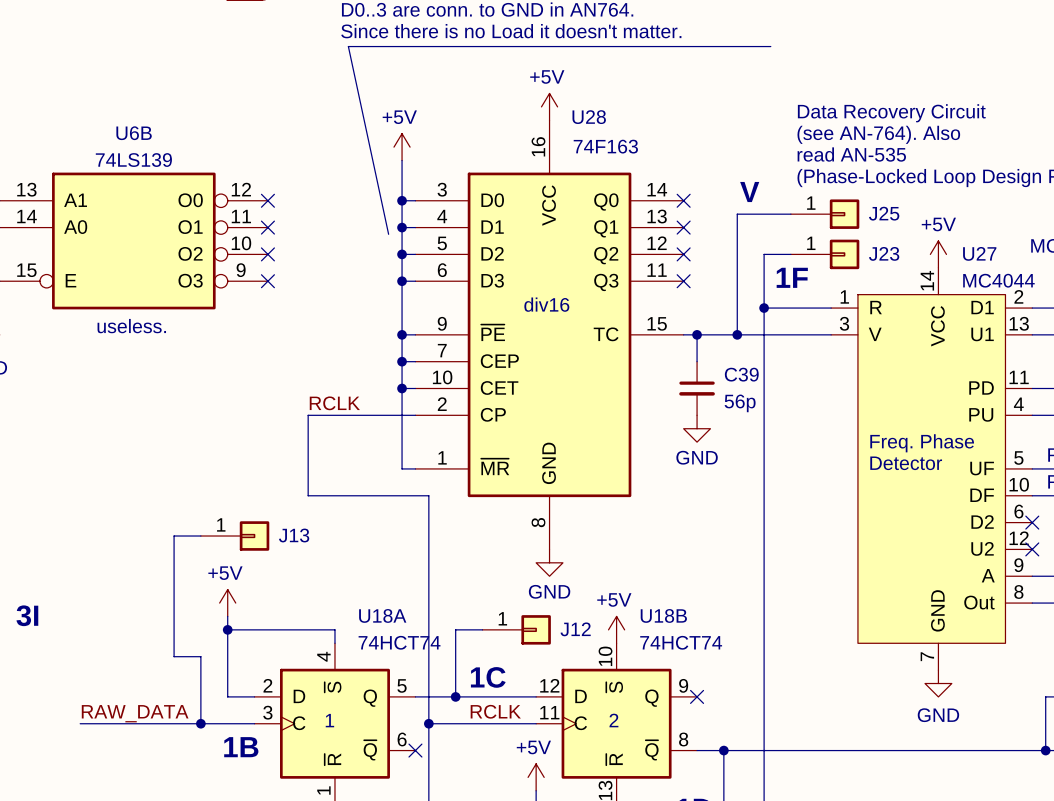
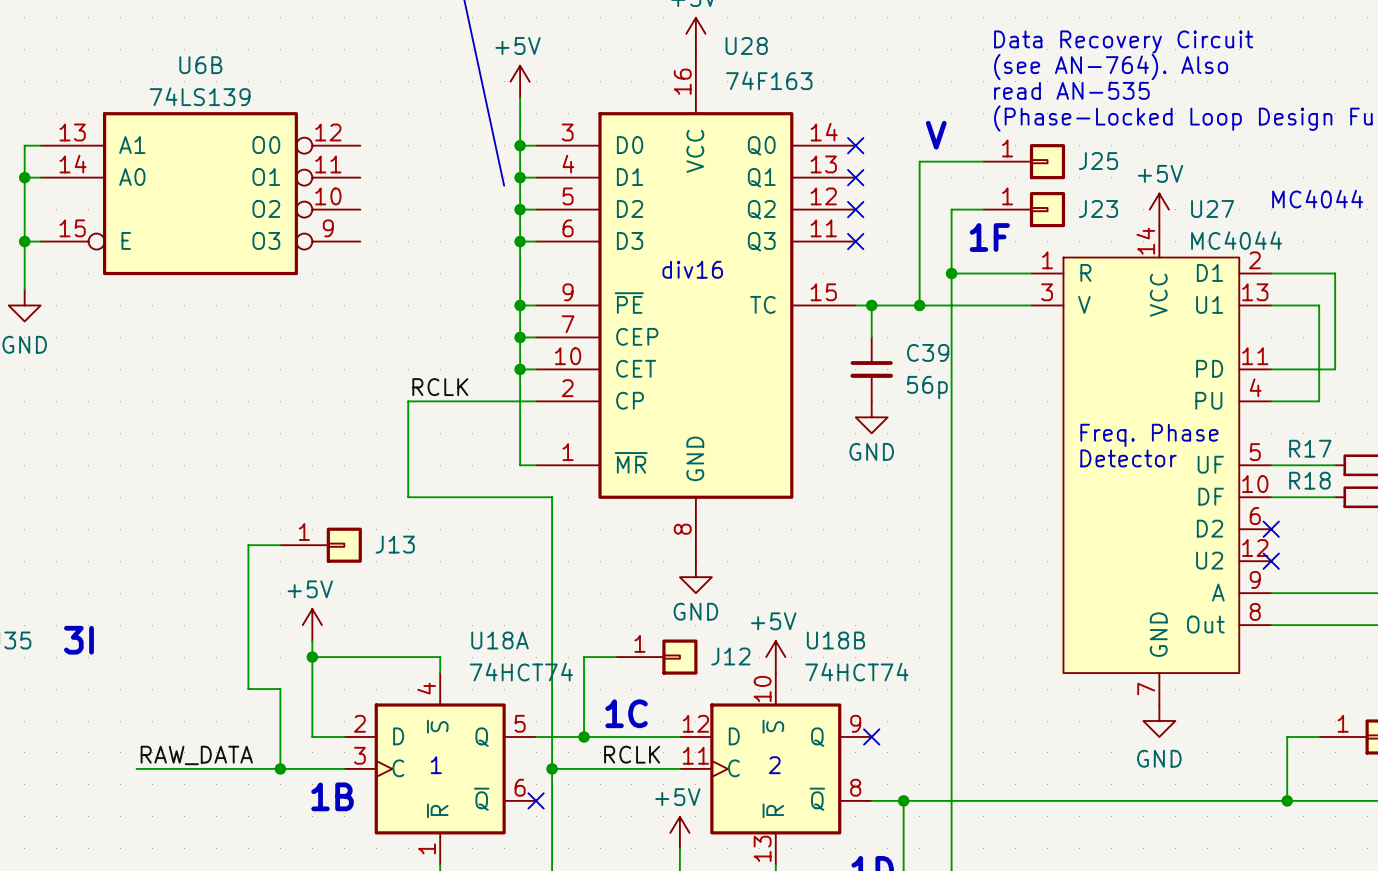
no-connect mark: (267, 200) -> none
no-connect mark: (267, 227) -> none
no-connect mark: (267, 254) -> none
no-connect mark: (267, 281) -> none
text: useless. (131, 326) -> none

